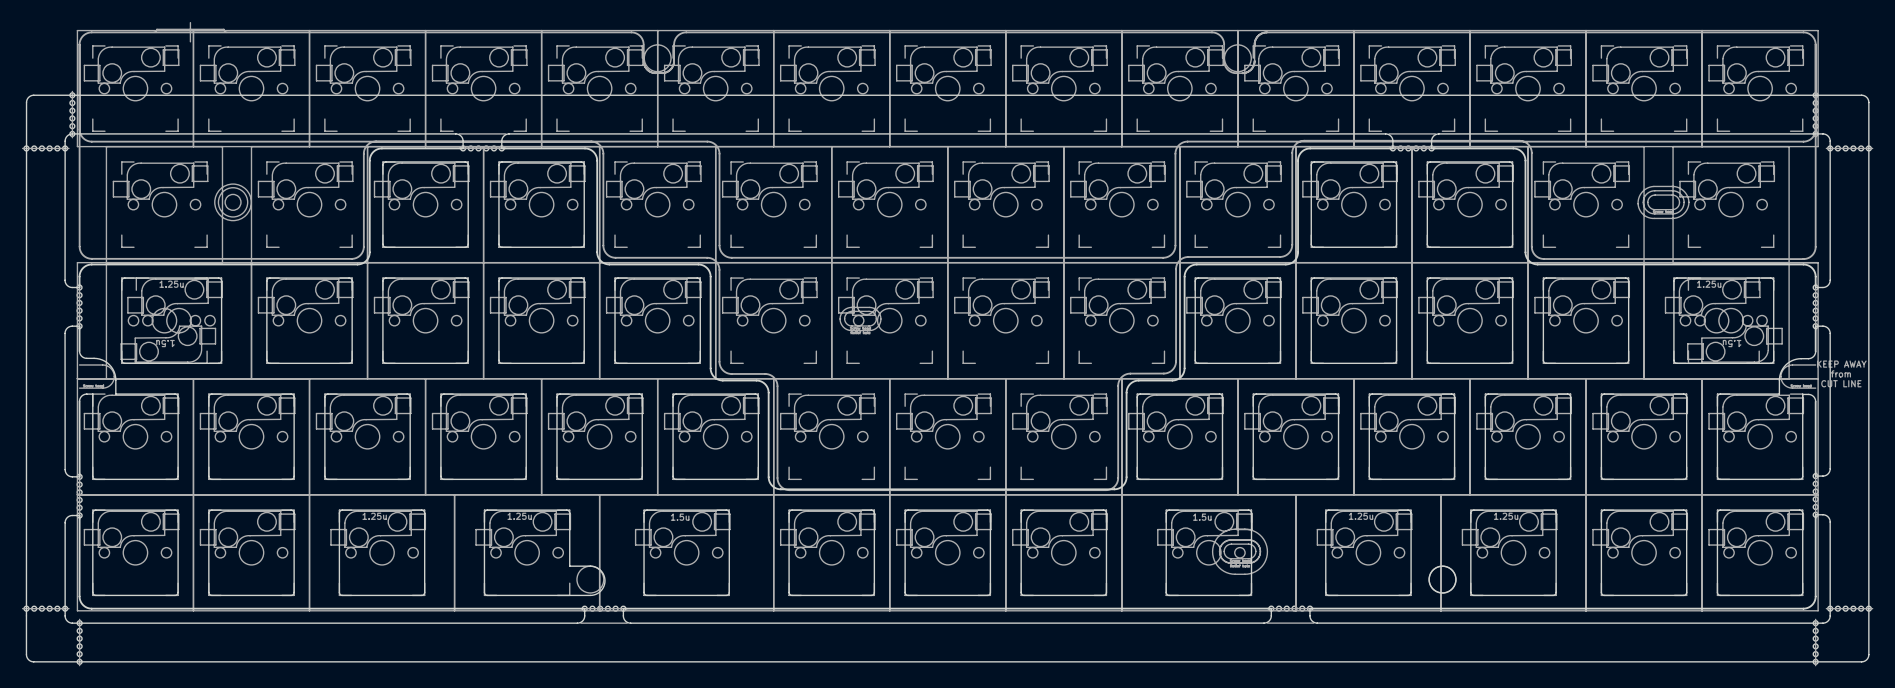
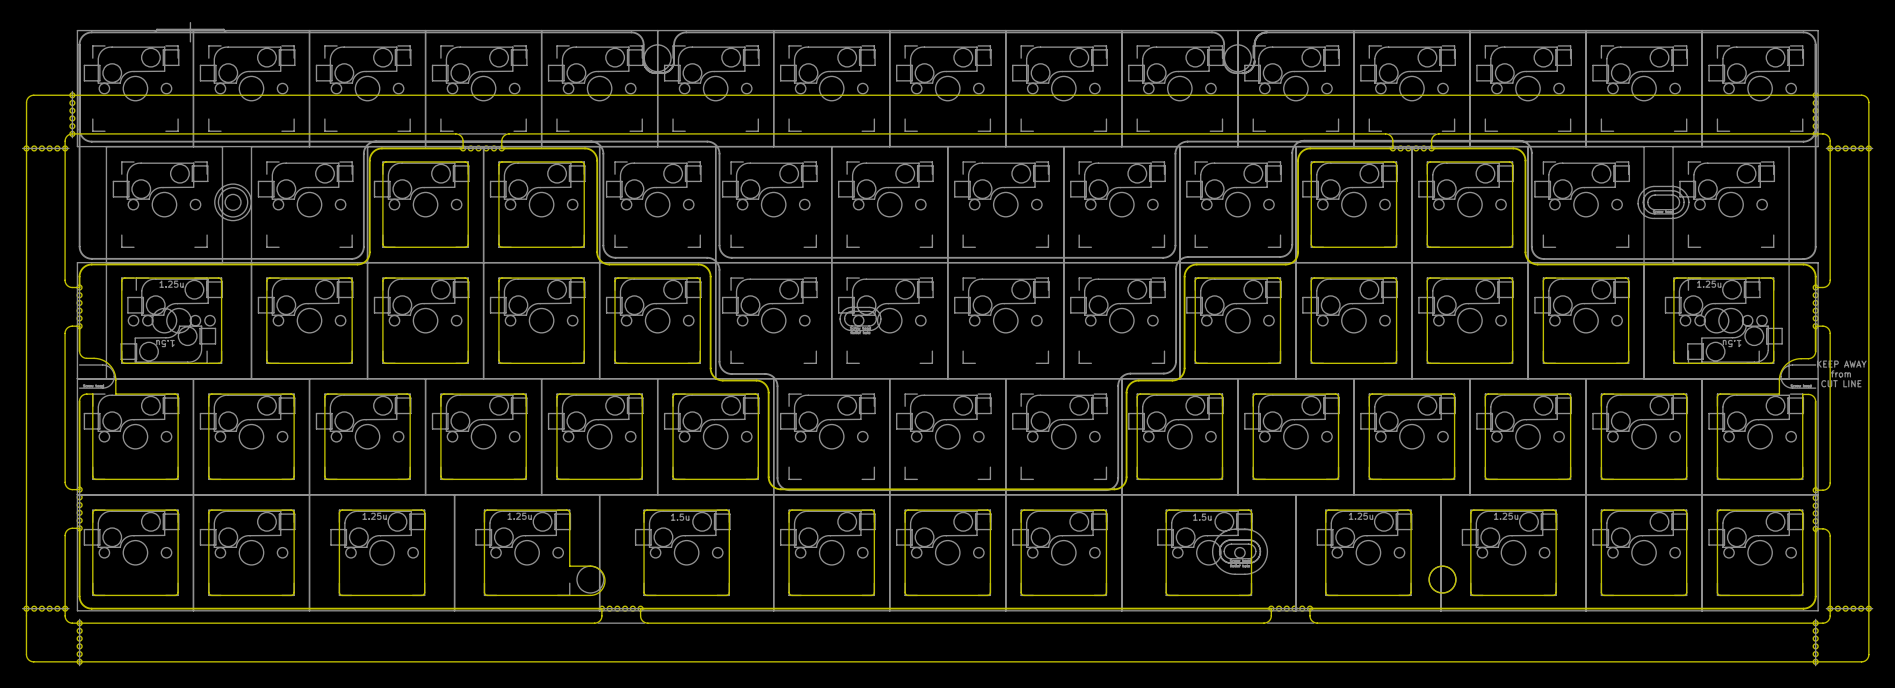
part footprint: [22, 22, 1874, 667] -> [22, 22, 1874, 667]

